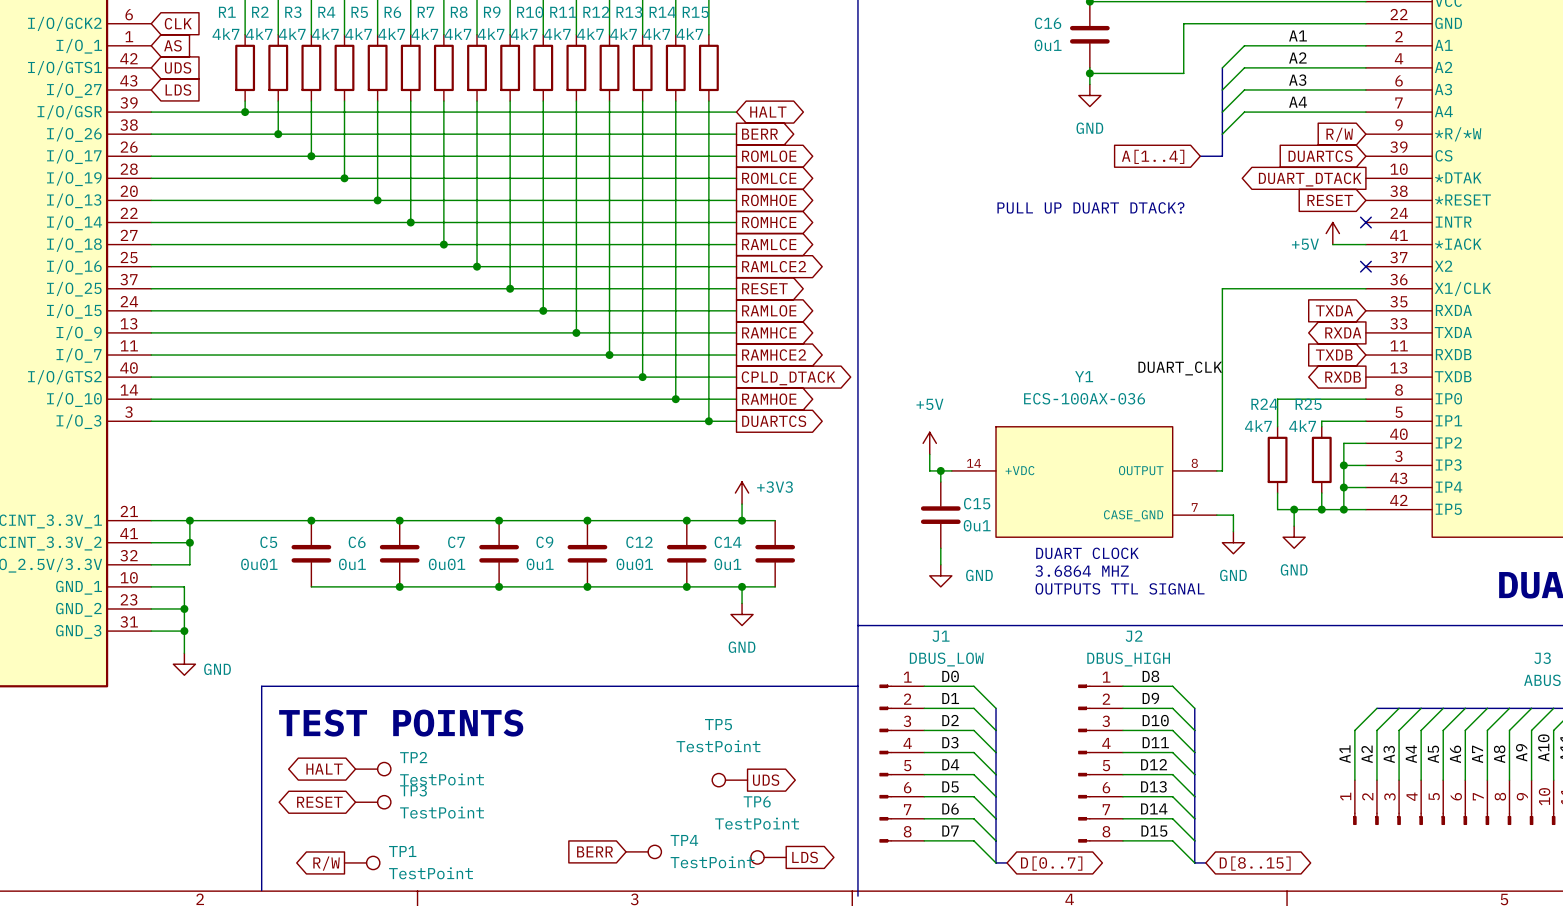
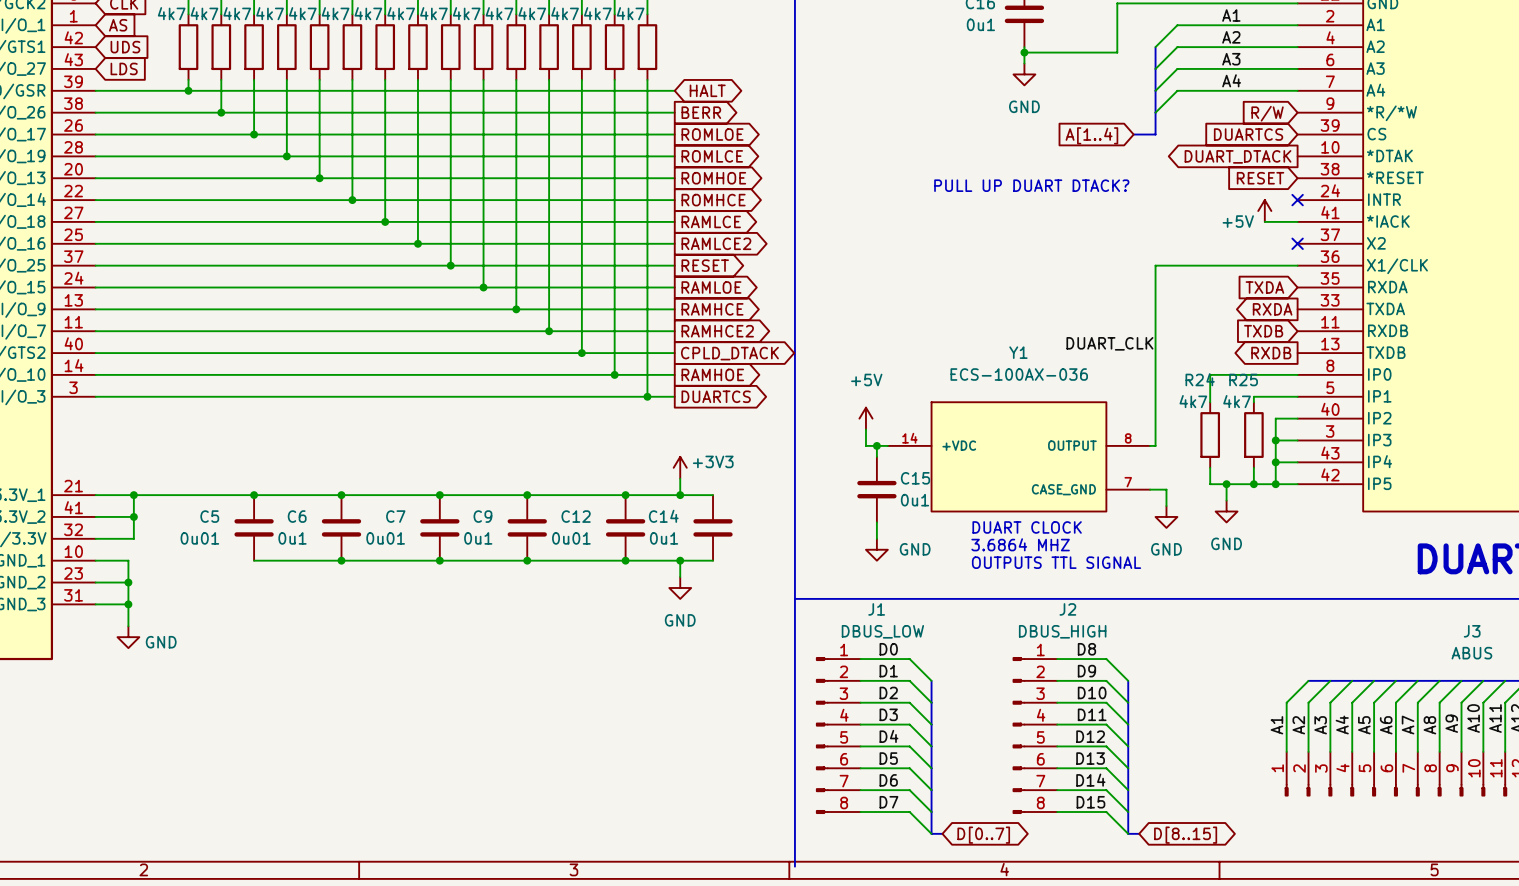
line: (857, 686) (261, 686) (261, 890) -> none
text: TEST POINTS (401, 723) -> none
global label: HALT (324, 769) -> none
TP2: TestPoint (373, 769) -> none
TP5: TestPoint (729, 780) -> none
global label: UDS (766, 780) -> none
global label: RESET (319, 802) -> none
TP3: TestPoint (373, 802) -> none
global label: BERR (594, 851) -> none
TP4: TestPoint (643, 851) -> none
TP6: TestPoint (768, 857) -> none
global label: LDS (805, 857) -> none
TP1: TestPoint (362, 862) -> none
global label: R/W (326, 863) -> none

